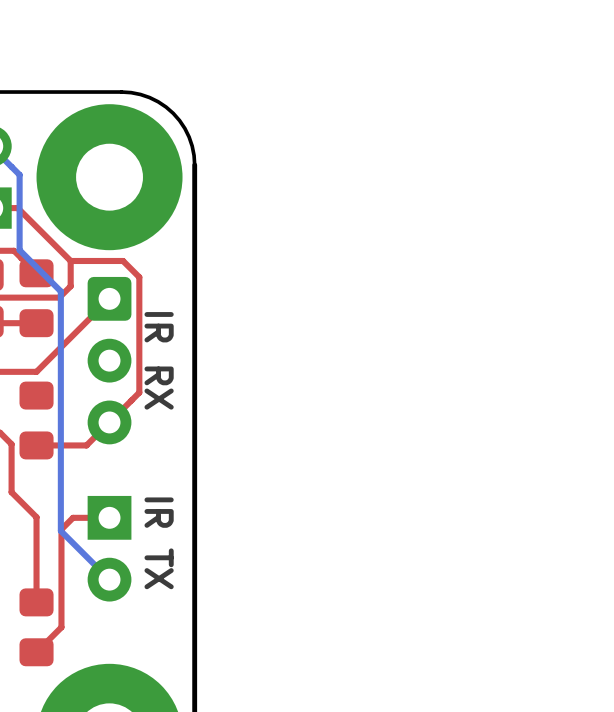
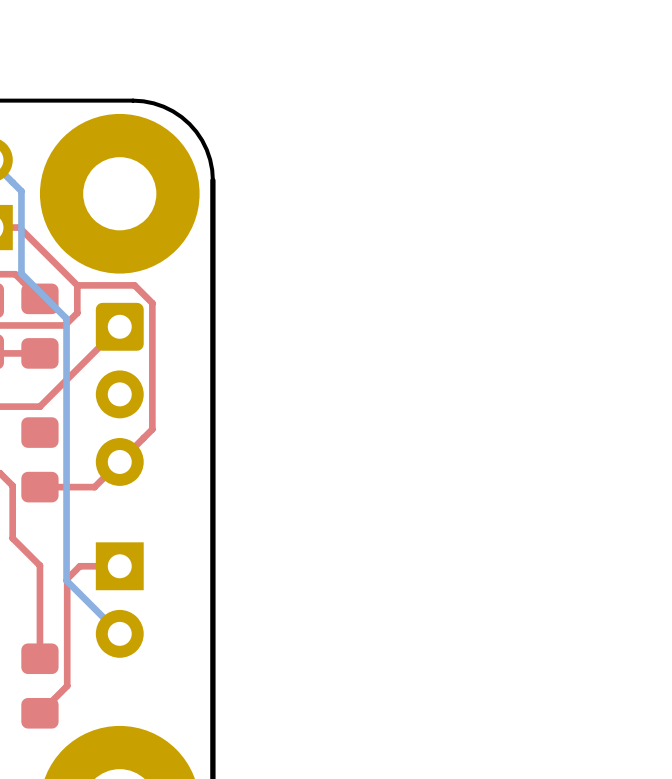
text: IR RX (159, 360) -> none
text: IR TX (159, 543) -> none

